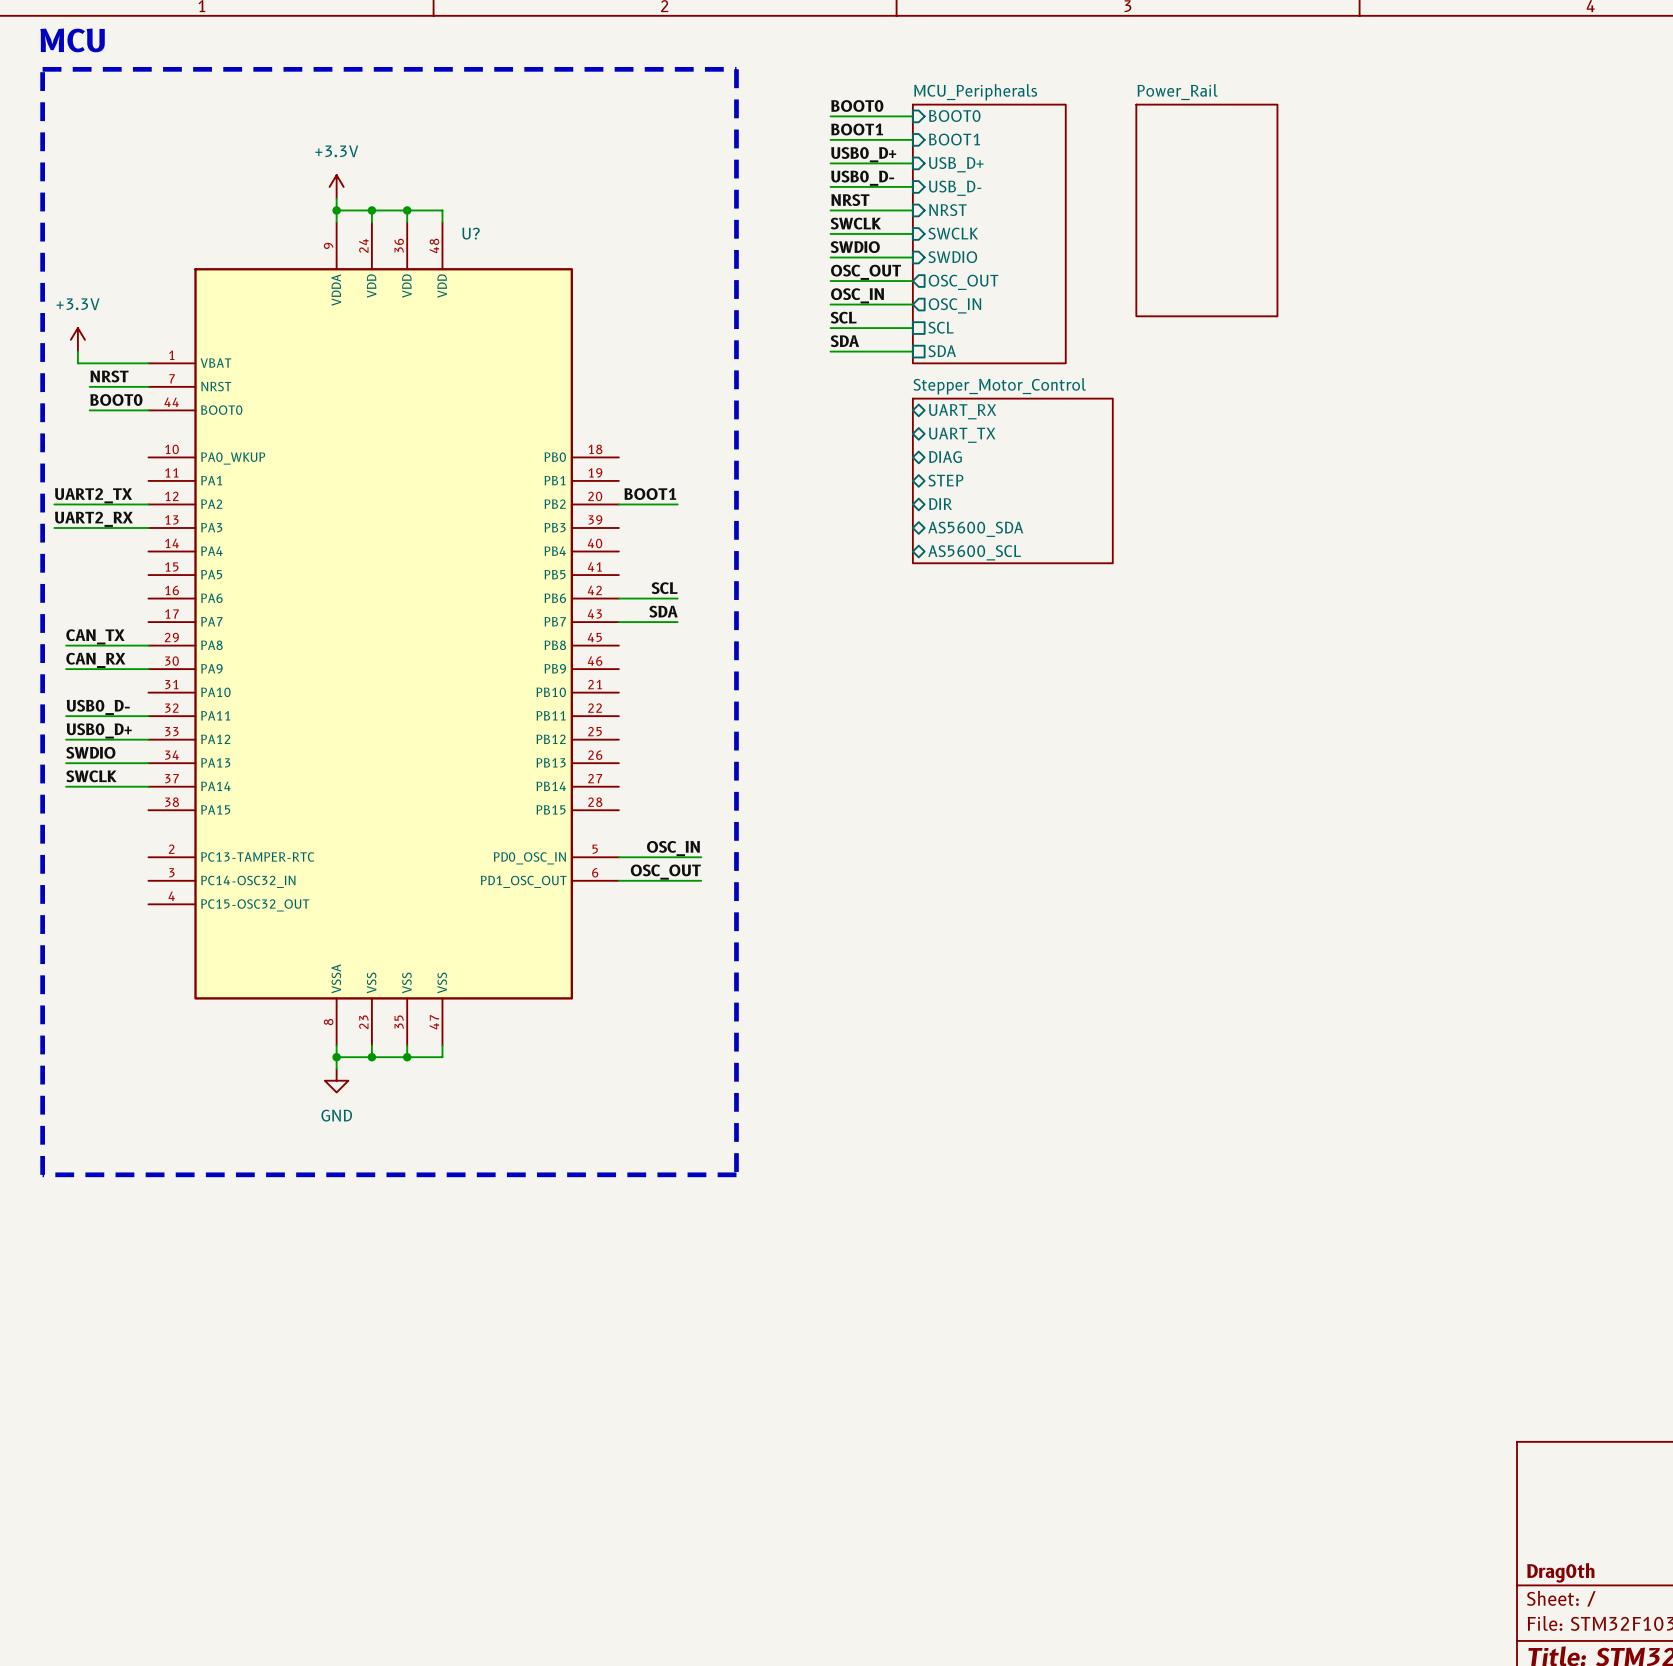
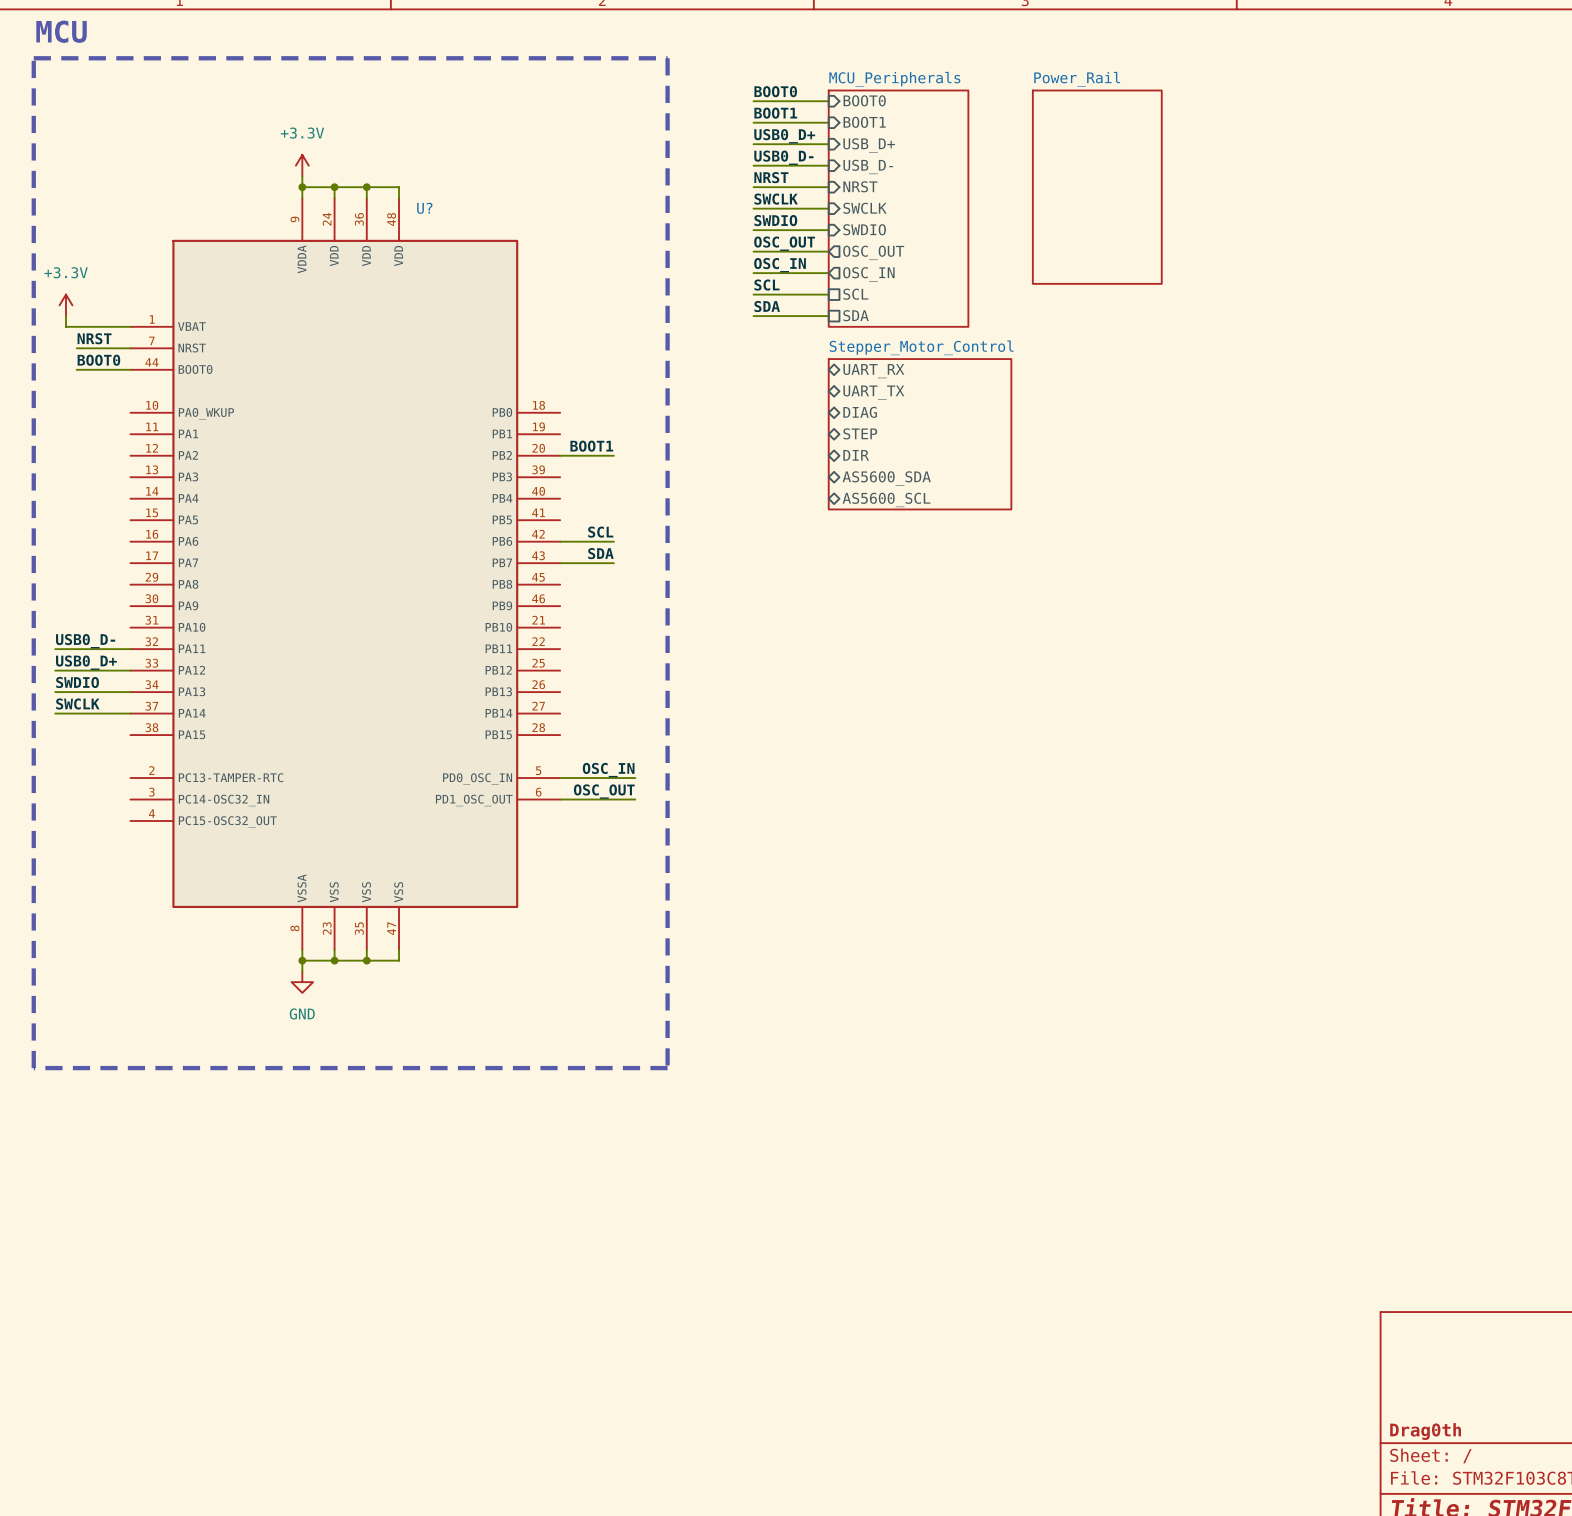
label: UART2_TX (93, 495) -> none
wire: (54, 504) (148, 504) -> none
label: UART2_RX (93, 519) -> none
wire: (54, 527) (148, 527) -> none
label: CAN_TX (95, 636) -> none
wire: (66, 645) (148, 645) -> none
label: CAN_RX (95, 660) -> none
wire: (66, 669) (148, 669) -> none

